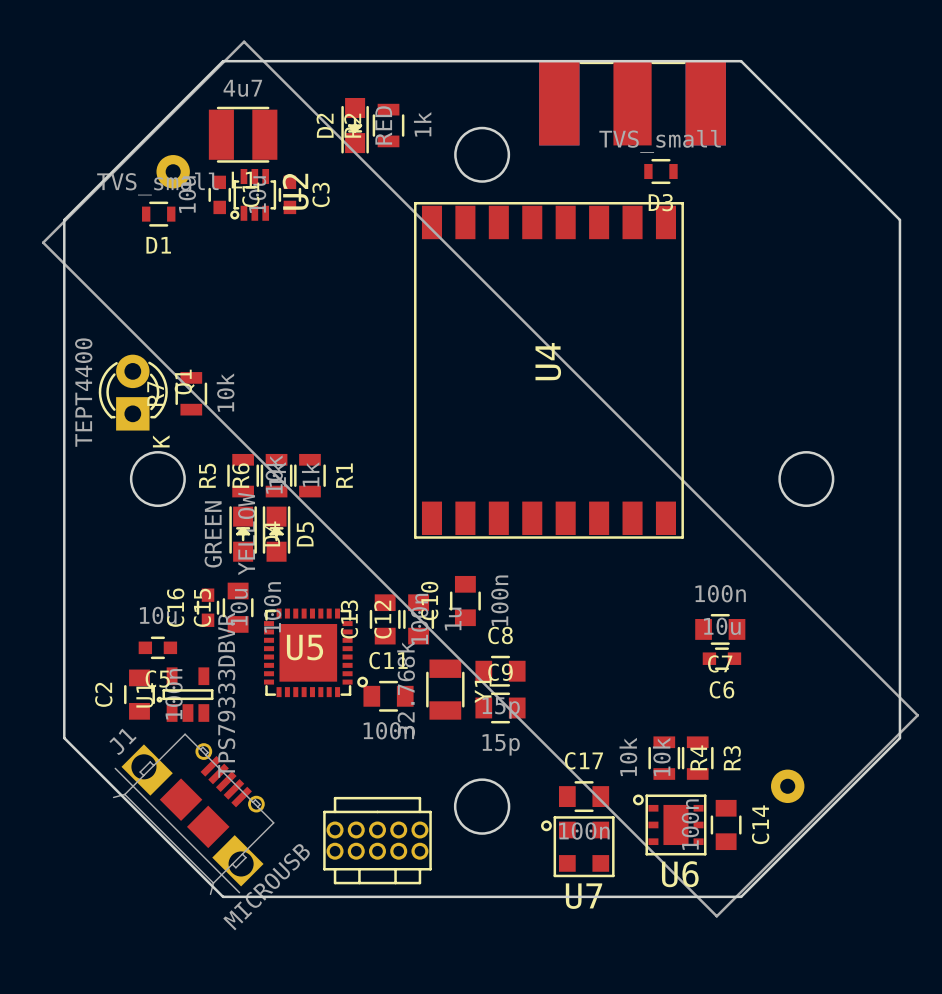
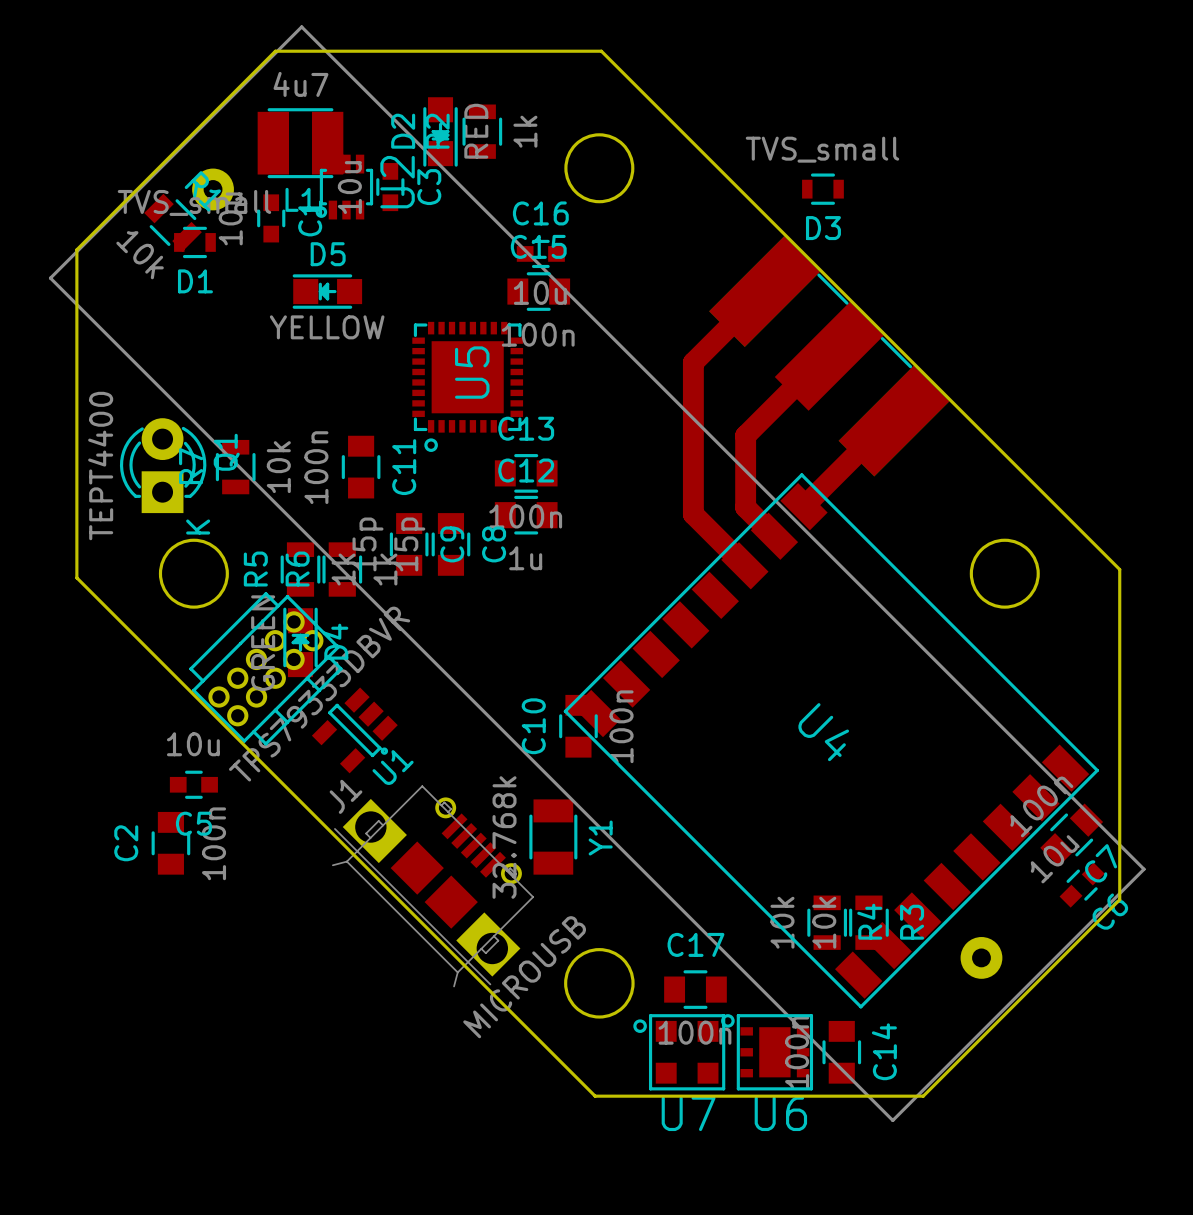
board edge: (483, 61) (741, 61) (899, 219) (899, 738) (898, 739) -> (601, 51) (1119, 569) (1119, 899)
part: (632, 102) -> none
U2 position: (253, 194) -> (344, 187)
C3 position: (289, 194) -> (390, 187)
top track: none -> (764, 291) (766, 289) (693, 362) (693, 514) (744, 565)
top track: none -> (829, 356) (829, 352) (745, 435) (745, 507) (774, 536)
part: none -> (829, 356)
top track: none -> (893, 421) (887, 423) (803, 506)
U4 rotation: 0° (548, 370) -> 45° counterclockwise (831, 740)
U4 position: (548, 370) -> (831, 740)
R1 rotation: 0° (309, 475) -> 45° counterclockwise (173, 222)
R1 position: (309, 475) -> (173, 222)
board edge: (64, 482) (64, 738) (223, 896) (478, 896) -> (76, 577) (595, 1096)
D5 rotation: 0° (276, 533) -> 90° counterclockwise (327, 291)
D5 position: (276, 533) -> (327, 291)
part: none -> (265, 668)
C16 rotation: 0° (208, 607) -> 90° clockwise (540, 253)
C16 position: (208, 607) -> (540, 253)
C15 rotation: 0° (238, 607) -> 90° clockwise (538, 291)
C15 position: (238, 607) -> (538, 291)
C13 rotation: 0° (385, 619) -> 90° clockwise (526, 473)
C13 position: (385, 619) -> (526, 473)
C12 rotation: 0° (418, 619) -> 90° clockwise (526, 515)
C12 position: (418, 619) -> (526, 515)
C7 rotation: 0° (720, 629) -> 45° counterclockwise (1071, 834)
C7 position: (720, 629) -> (1071, 834)
U5 rotation: 0° (316, 652) -> 90° clockwise (467, 386)
U5 position: (316, 652) -> (467, 386)
C6 rotation: 0° (721, 658) -> 45° counterclockwise (1082, 885)
C6 position: (721, 658) -> (1082, 885)
C8 rotation: 0° (500, 671) -> 90° clockwise (450, 544)
C8 position: (500, 671) -> (450, 544)
U1 rotation: 0° (185, 694) -> 135° counterclockwise (354, 730)
U1 position: (185, 694) -> (354, 730)
C11 rotation: 0° (388, 696) -> 90° clockwise (361, 467)
C11 position: (388, 696) -> (361, 467)
C9 rotation: 0° (500, 707) -> 90° clockwise (409, 544)
C9 position: (500, 707) -> (409, 544)
C17 position: (584, 796) -> (695, 989)
J1 position: (193, 814) -> (432, 886)
U6 position: (669, 824) -> (767, 1052)
C14 position: (726, 824) -> (841, 1052)
part: (377, 840) -> none
U7 position: (577, 846) -> (679, 1052)

